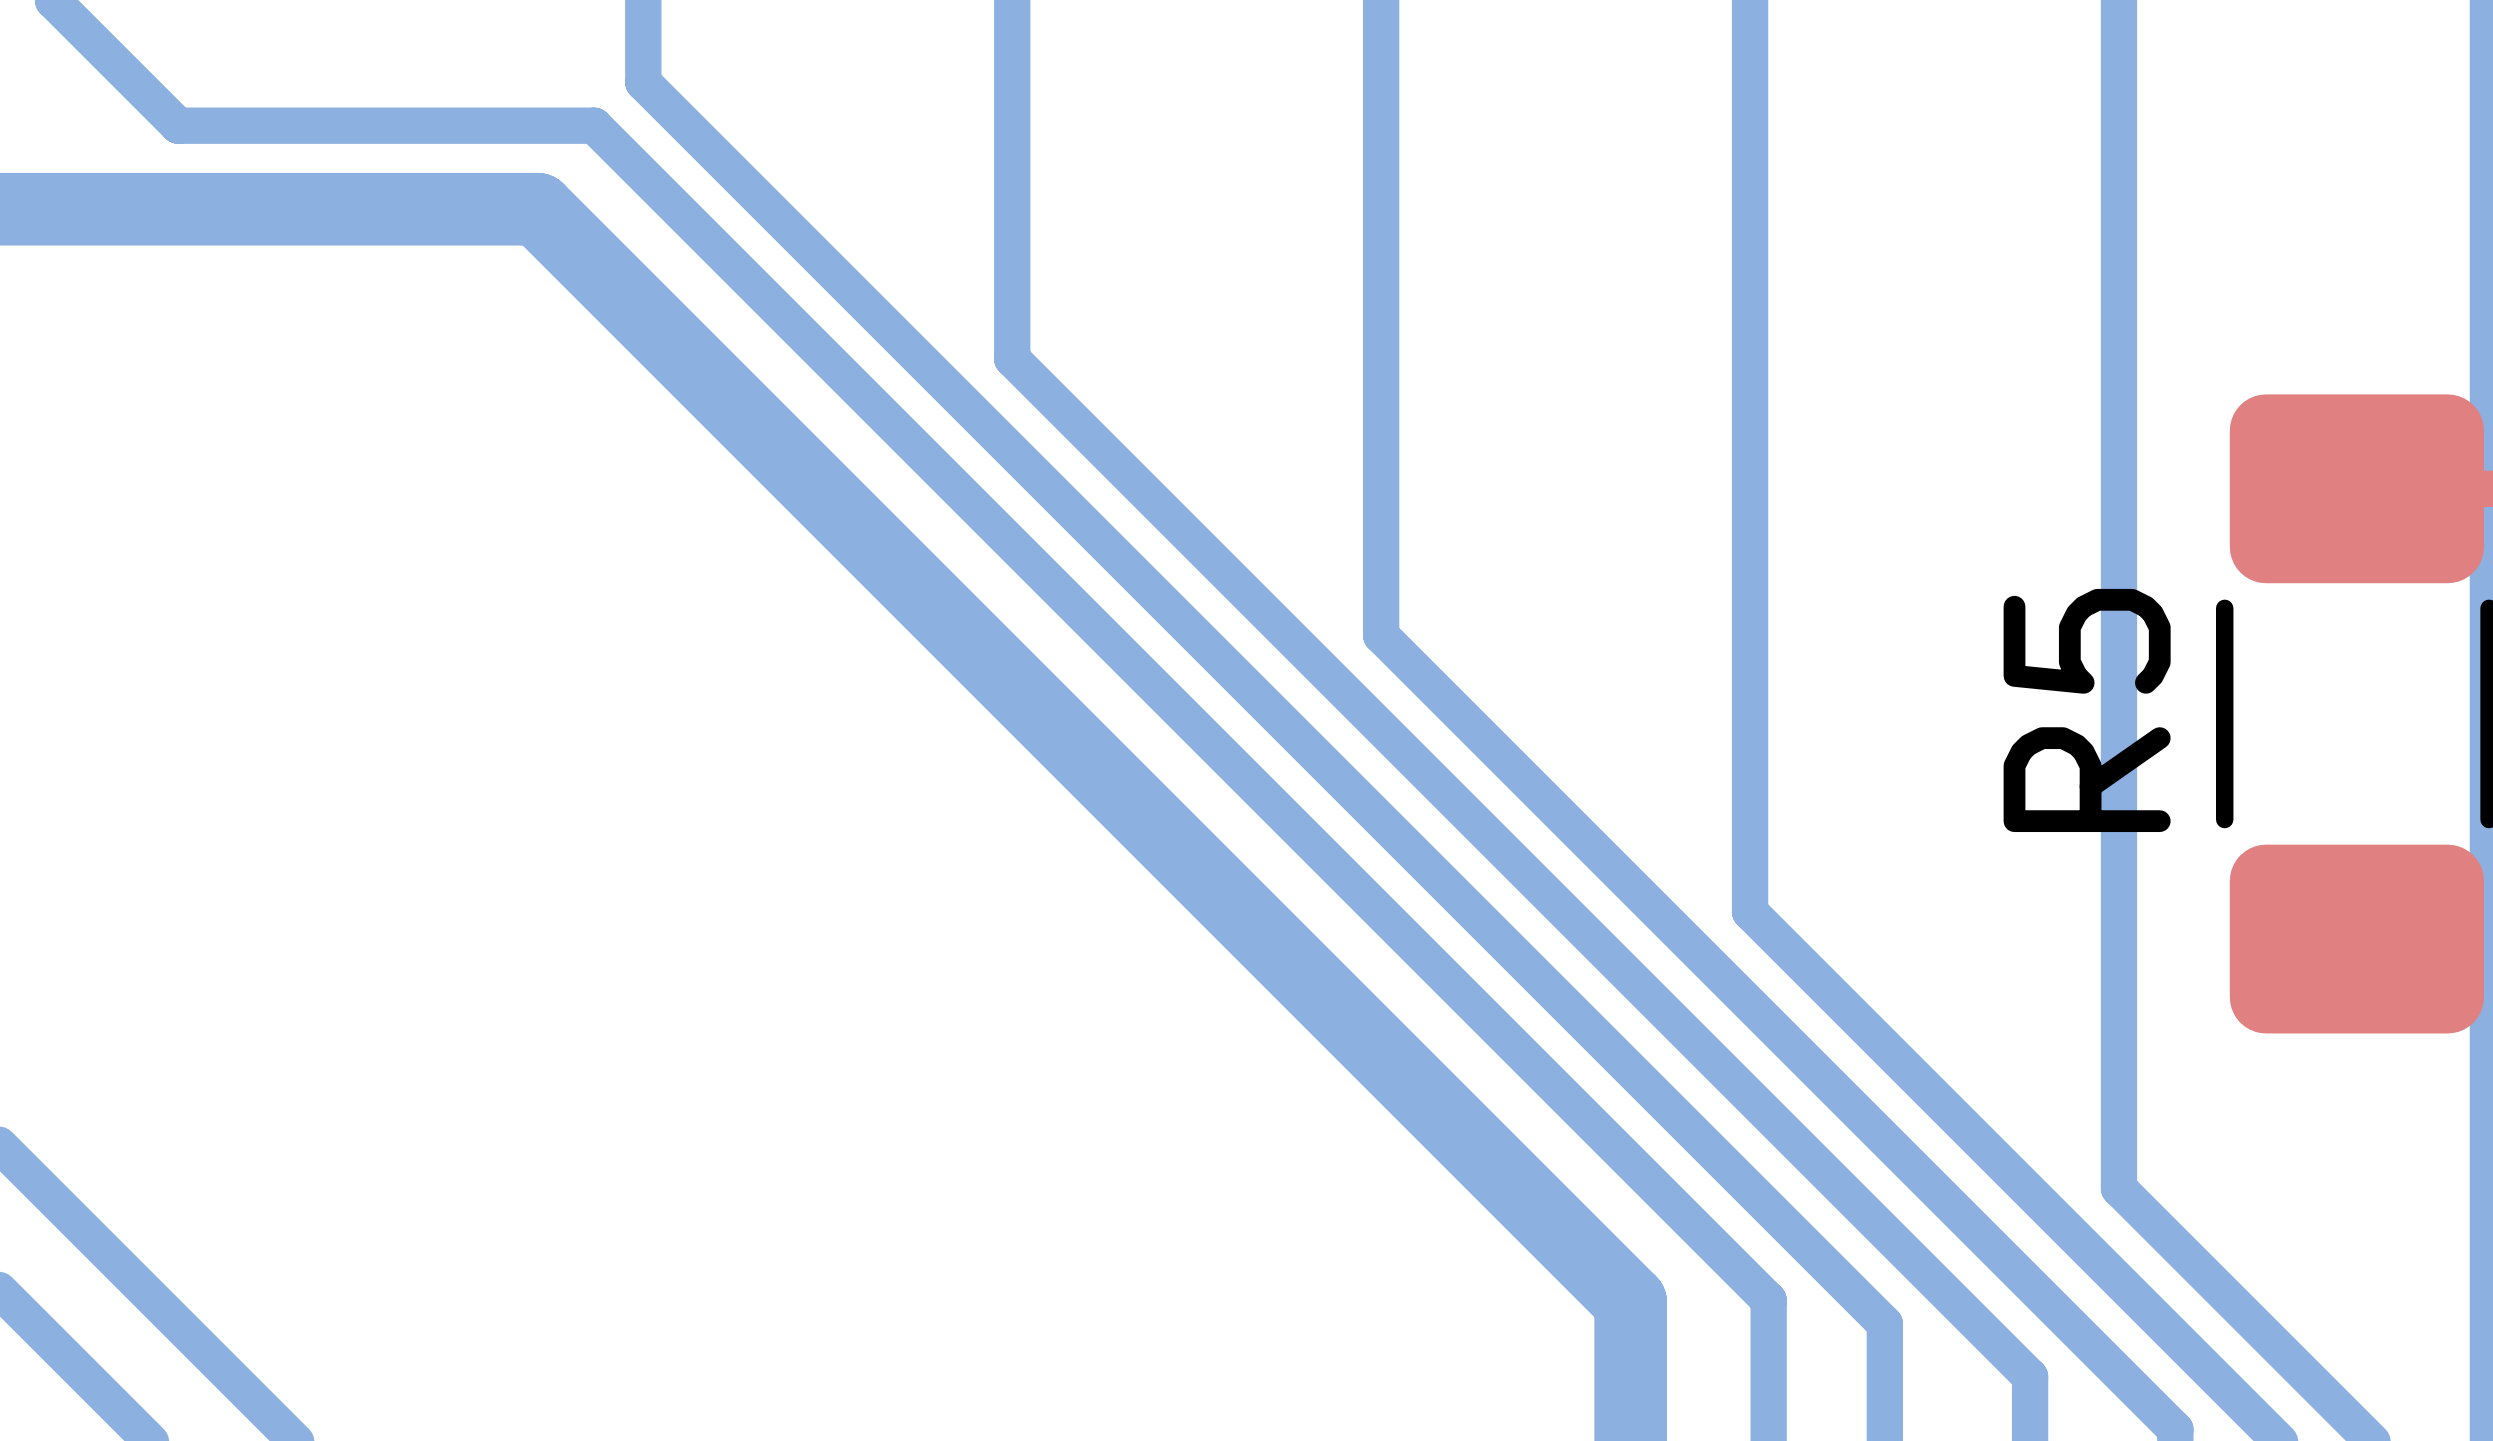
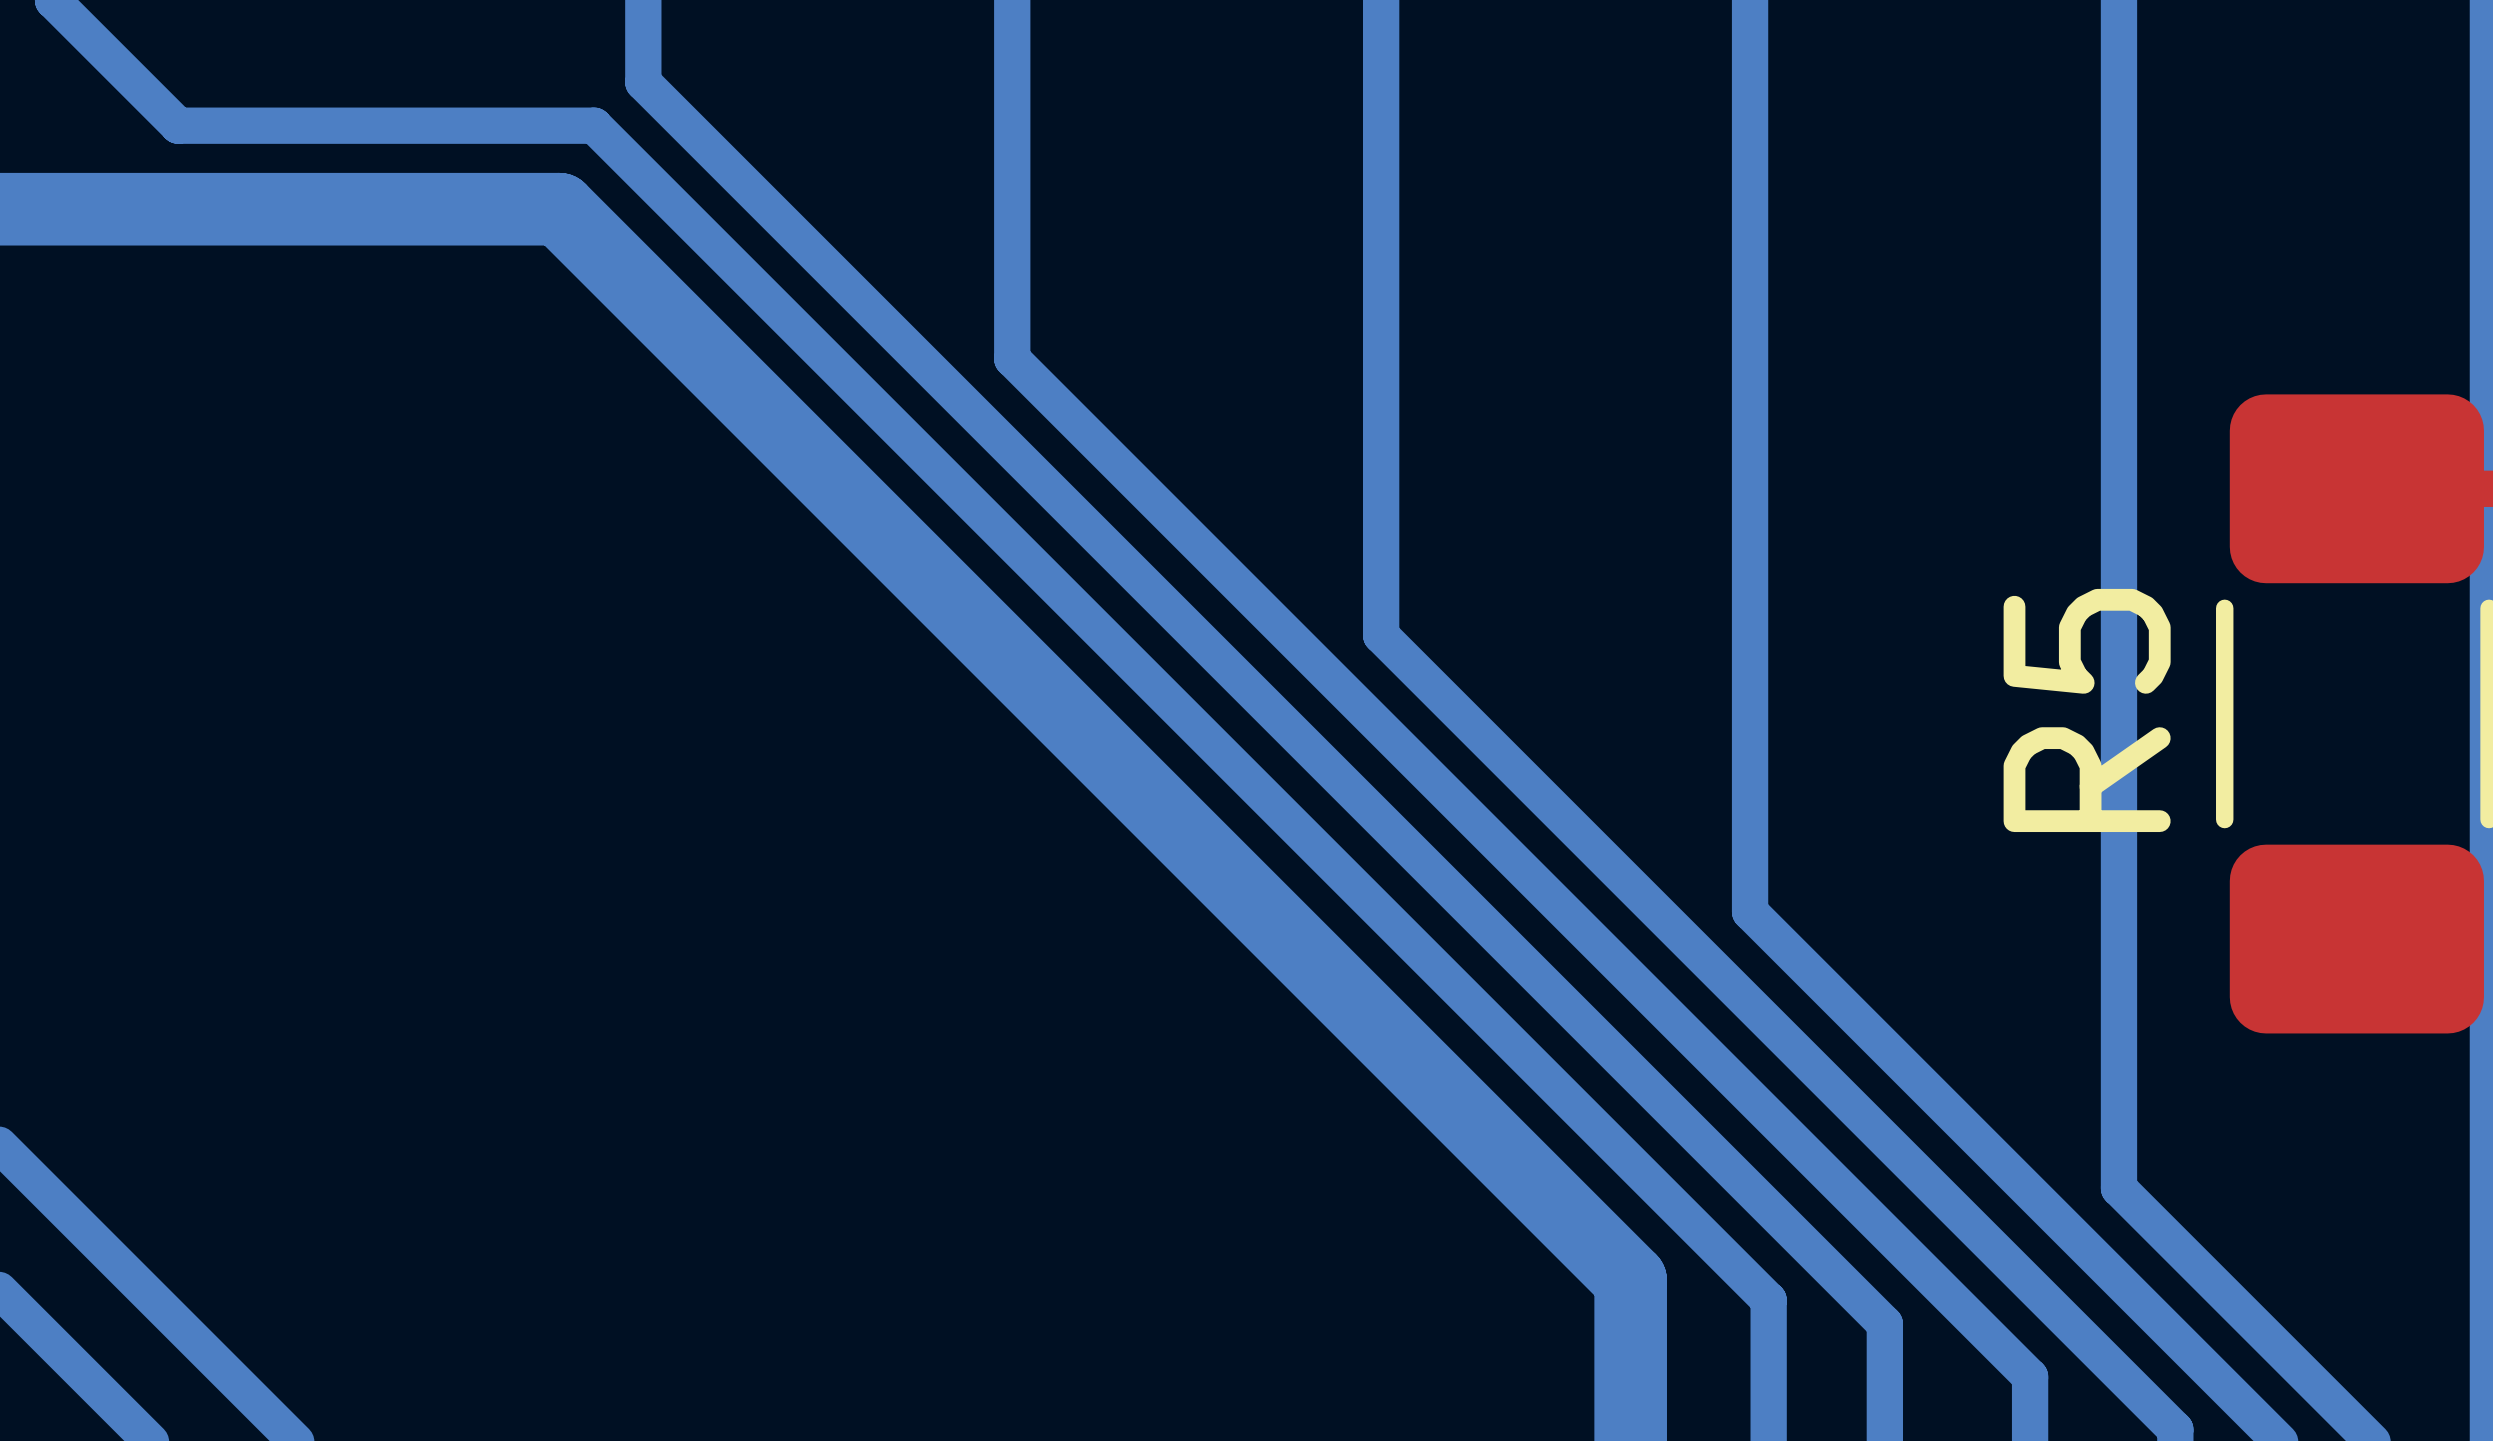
bottom track: (537, 209) (1630, 1302) -> (537, 209) (559, 209) (1630, 1280) (1630, 1302)

